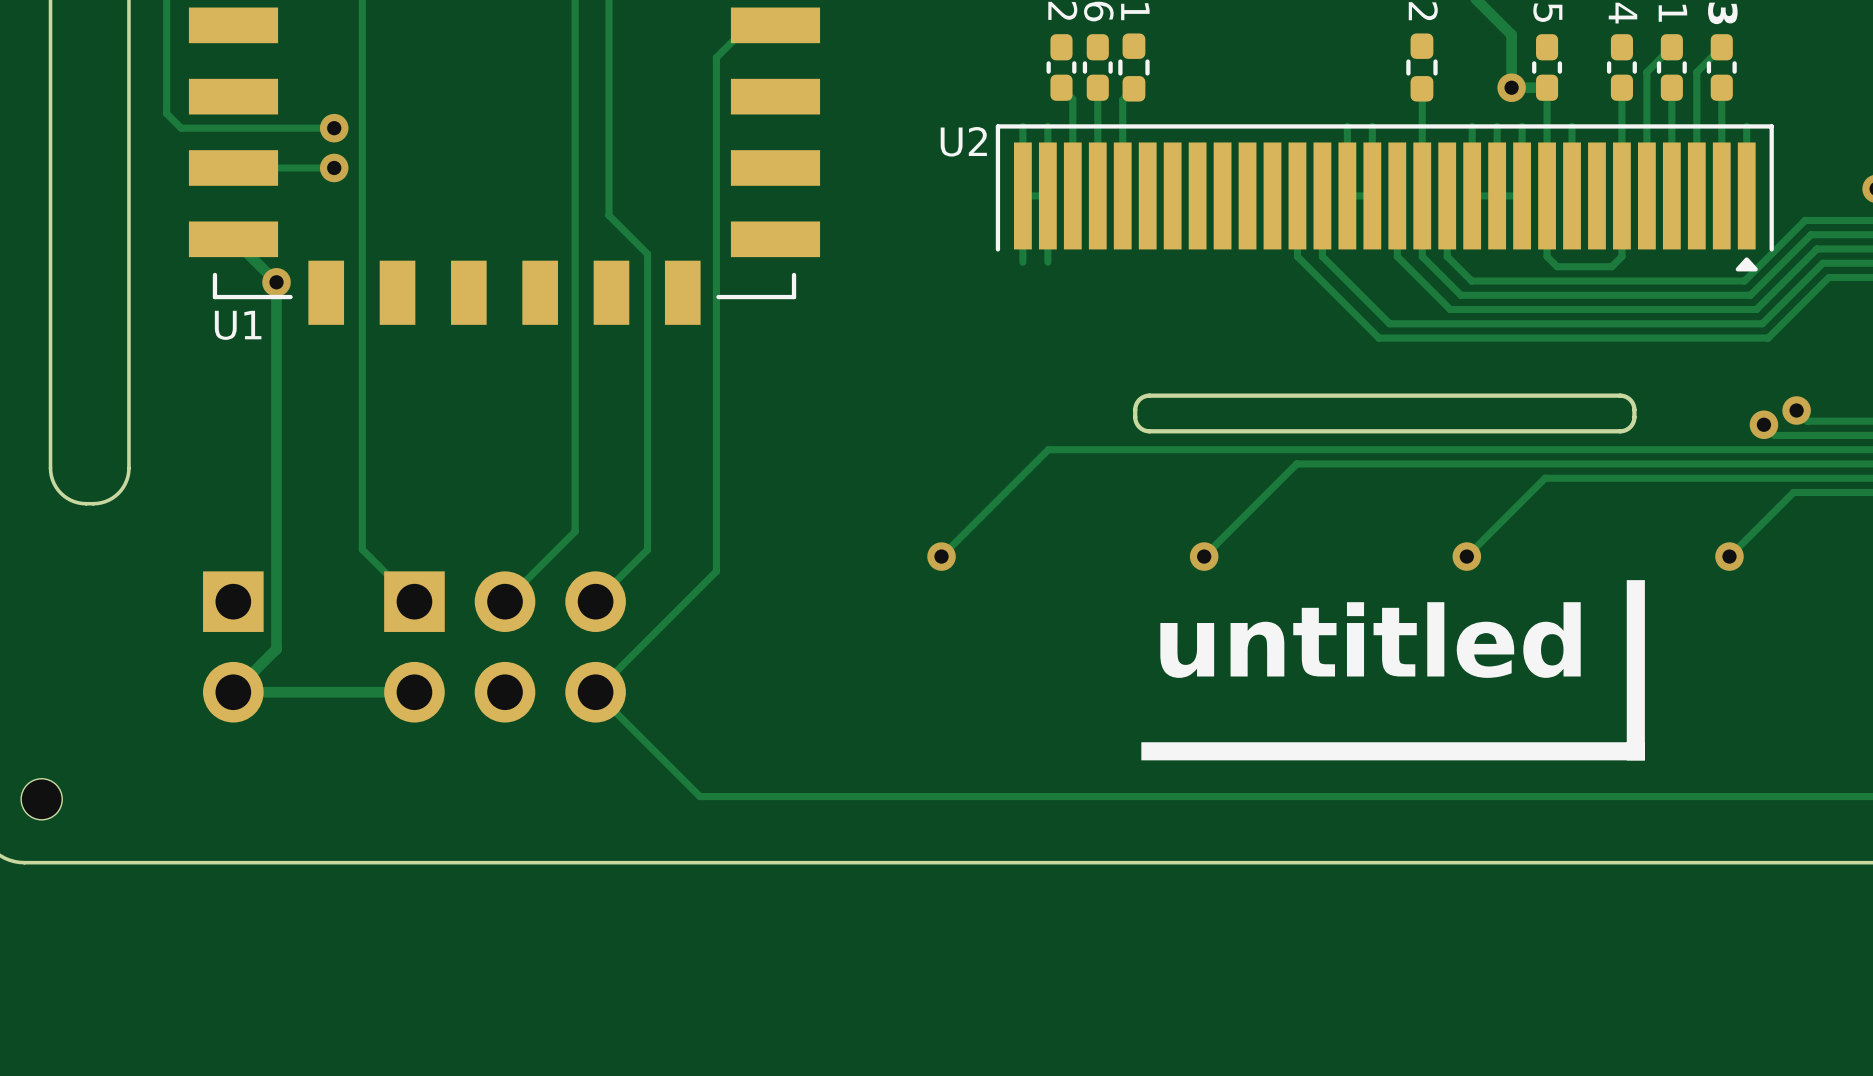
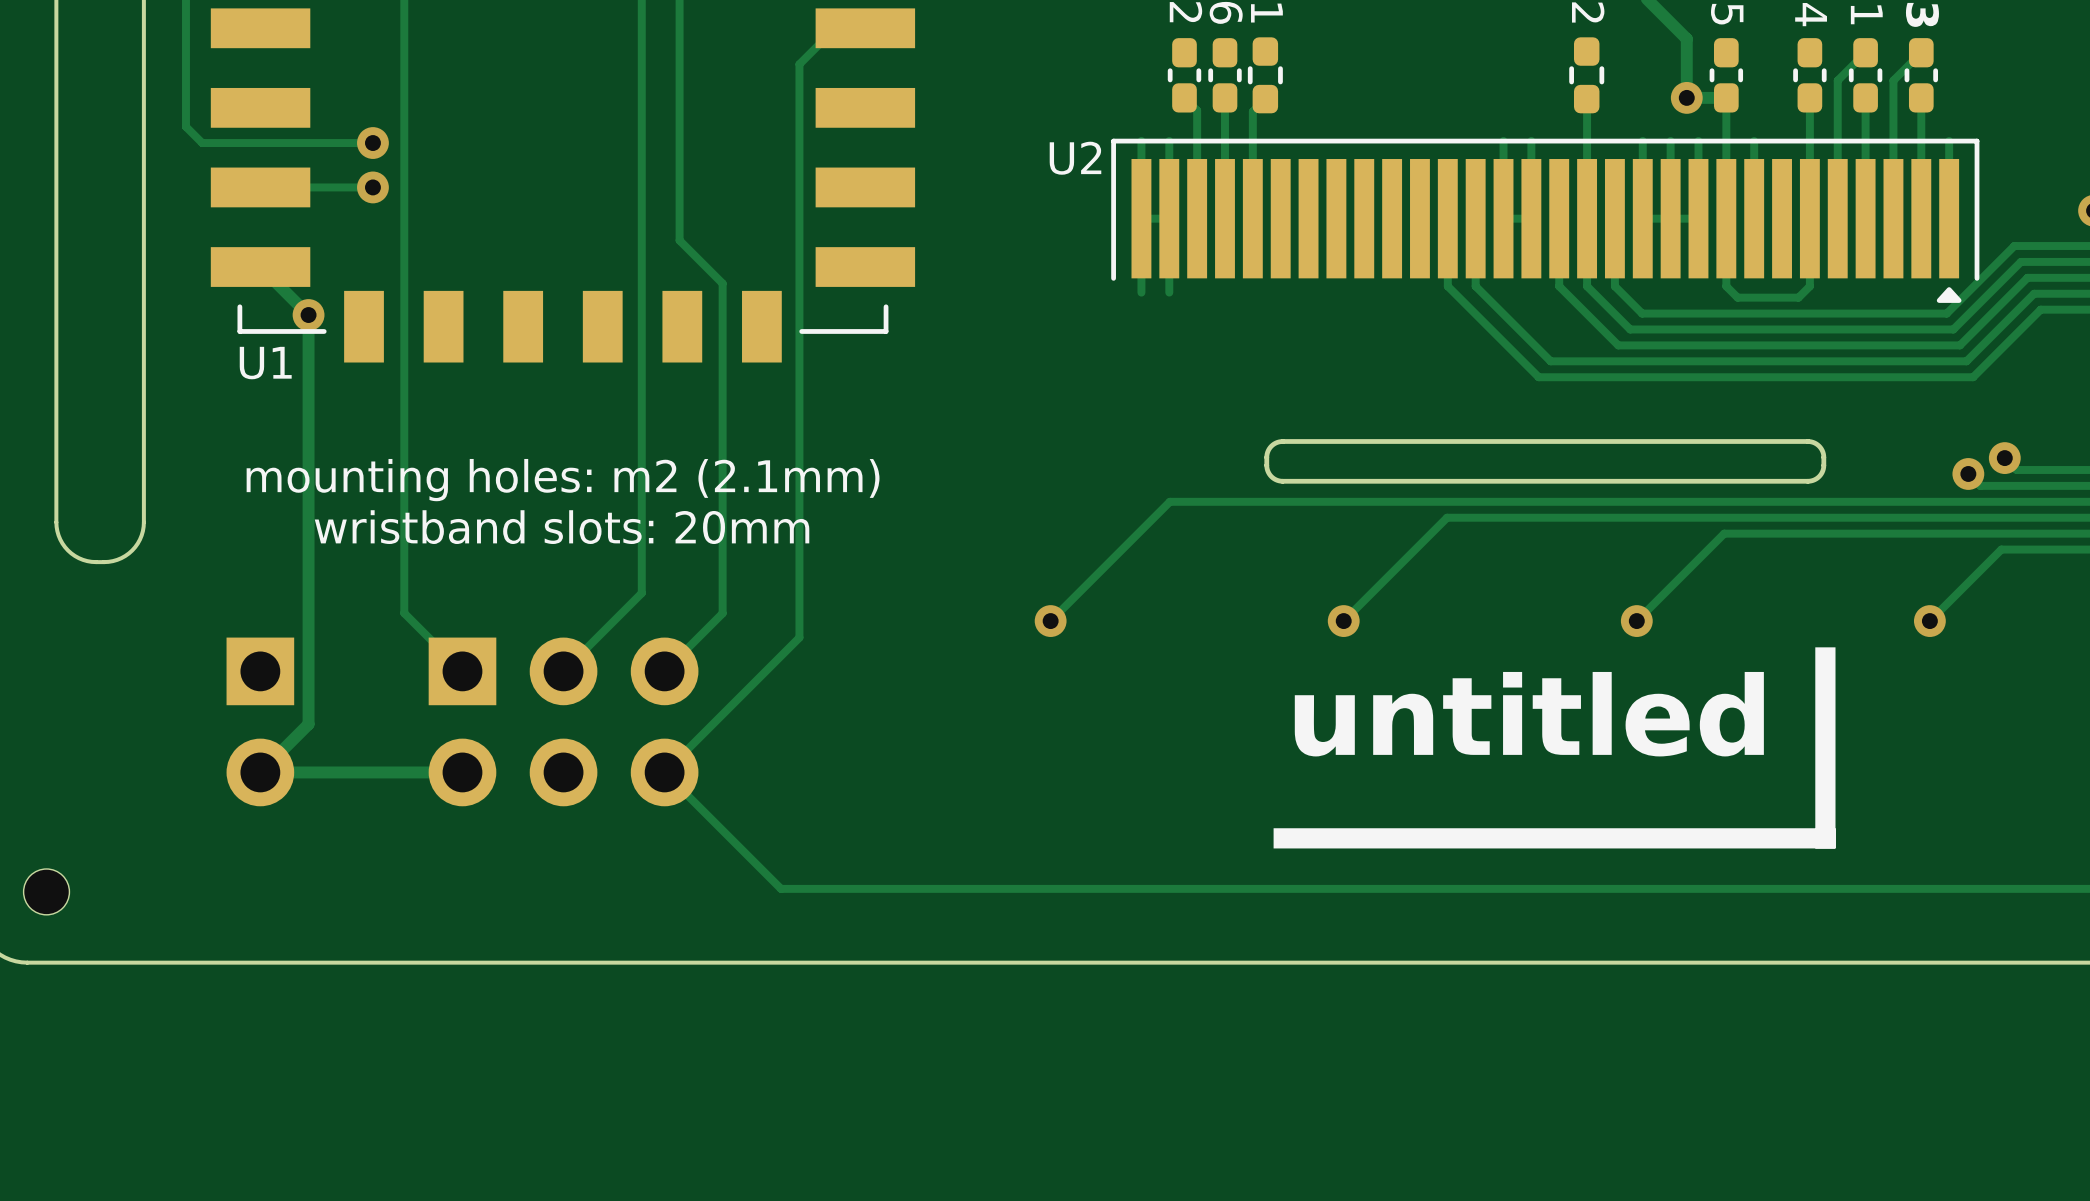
text: none -> mounting holes: m2 (2.1mm) (563, 480)
text: none -> wristband slots: 20mm (562, 527)

